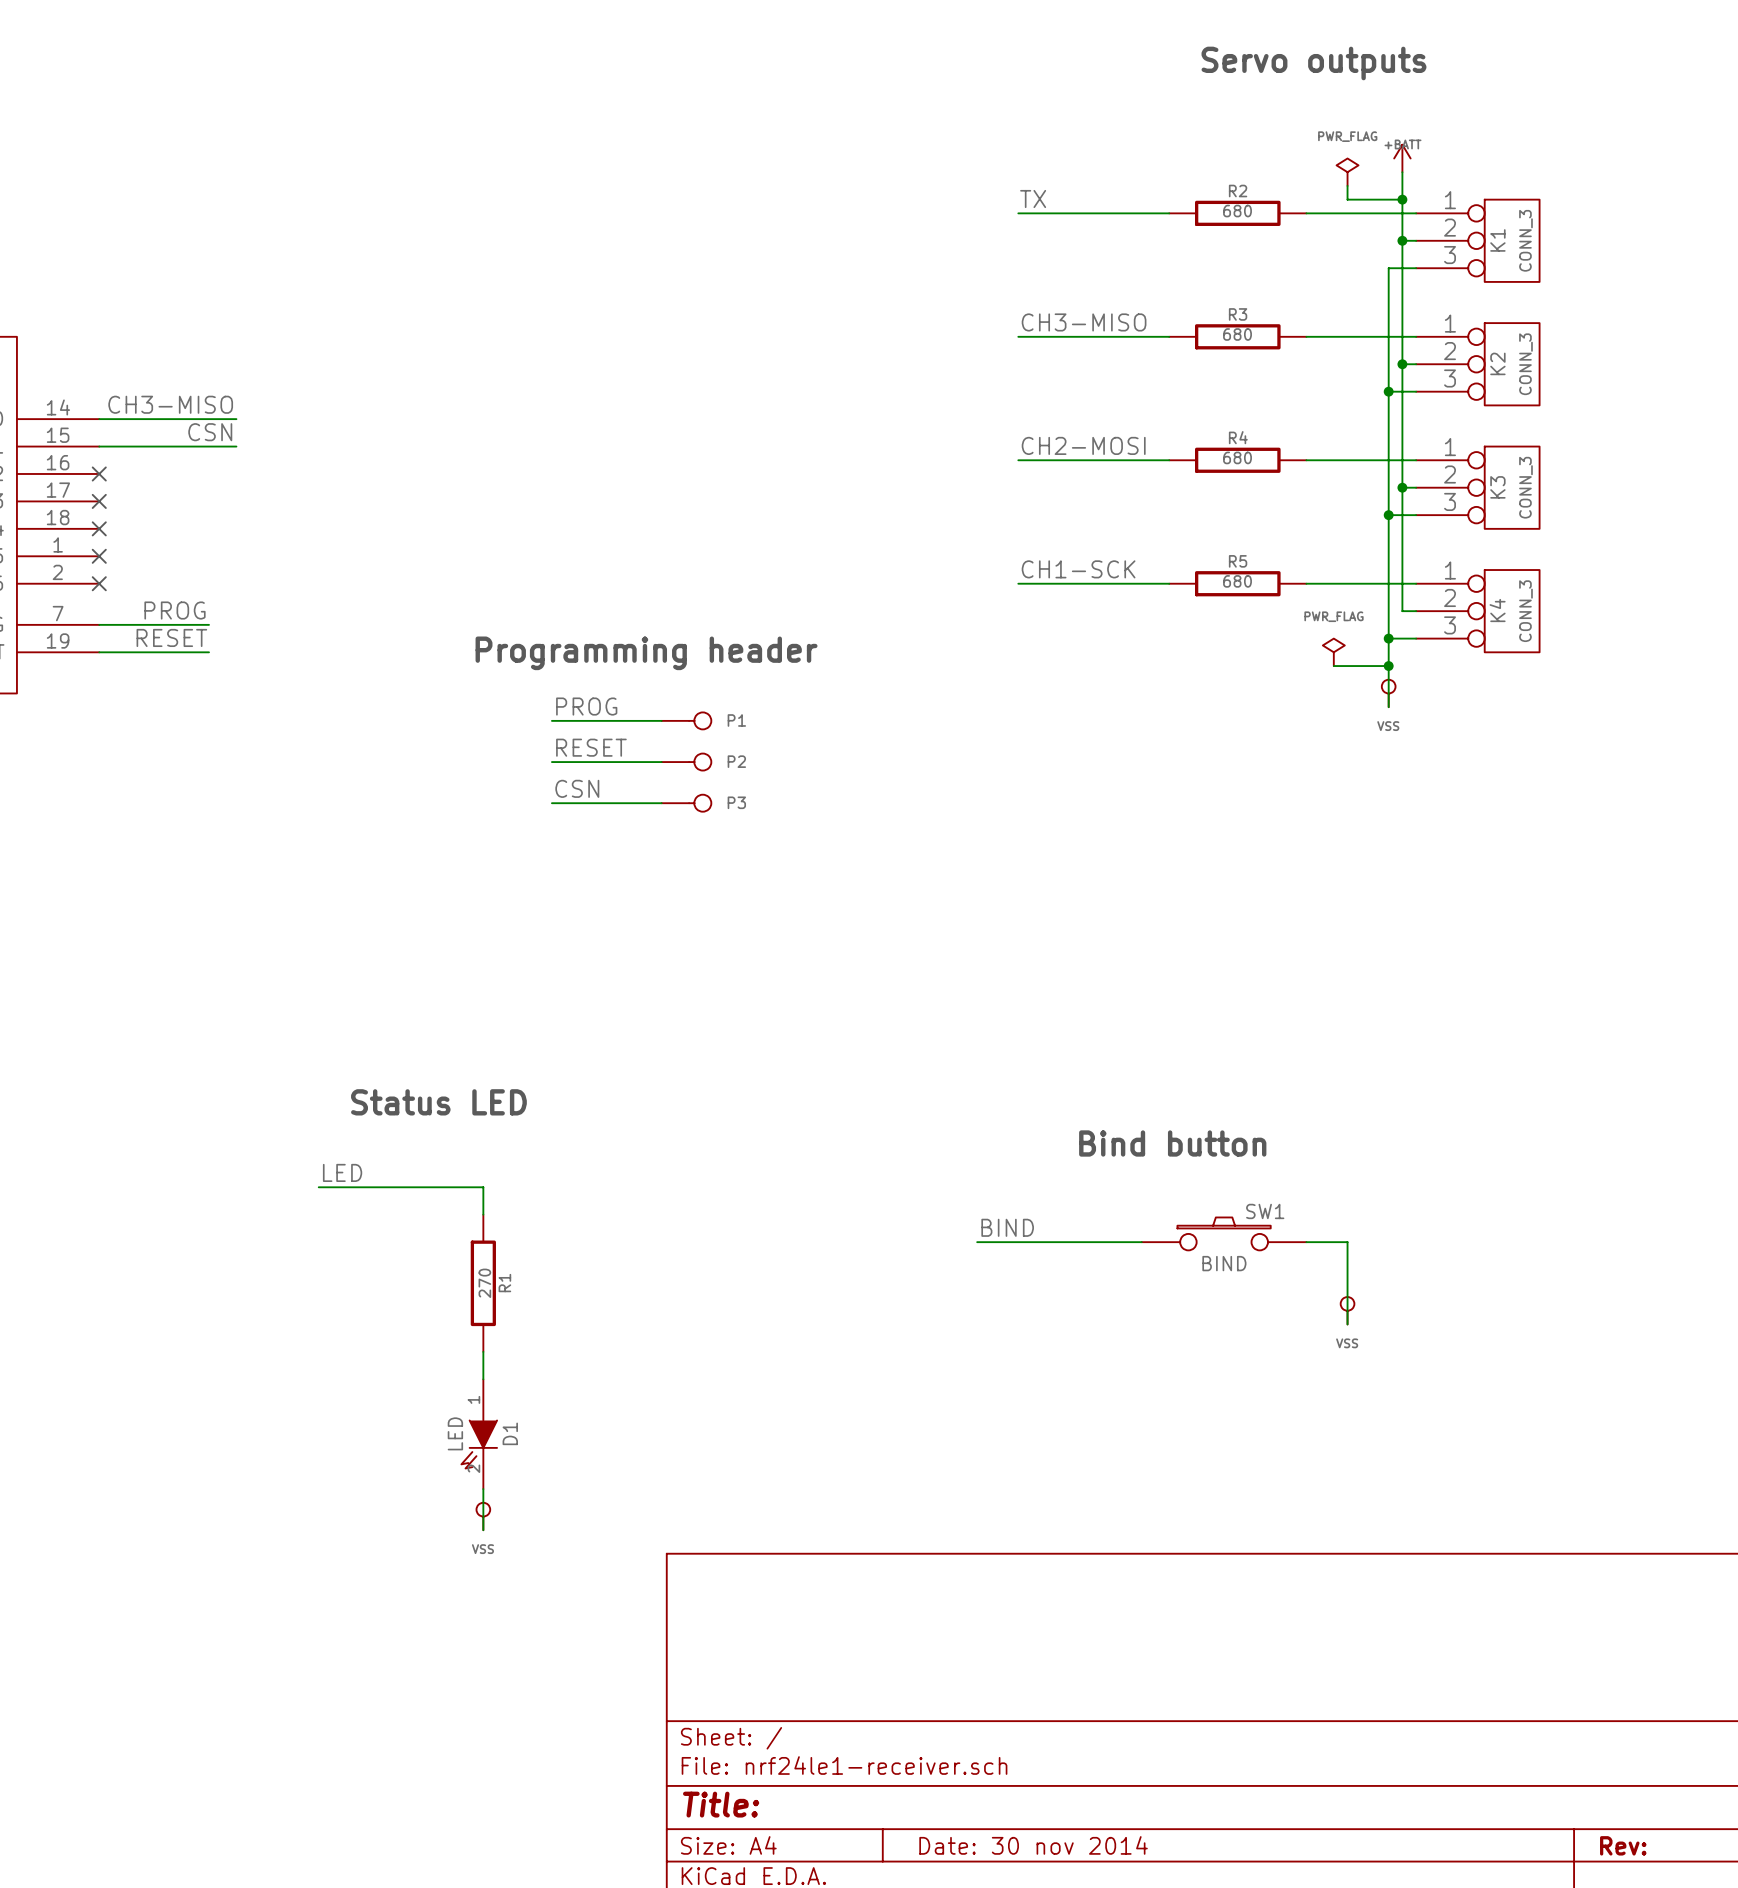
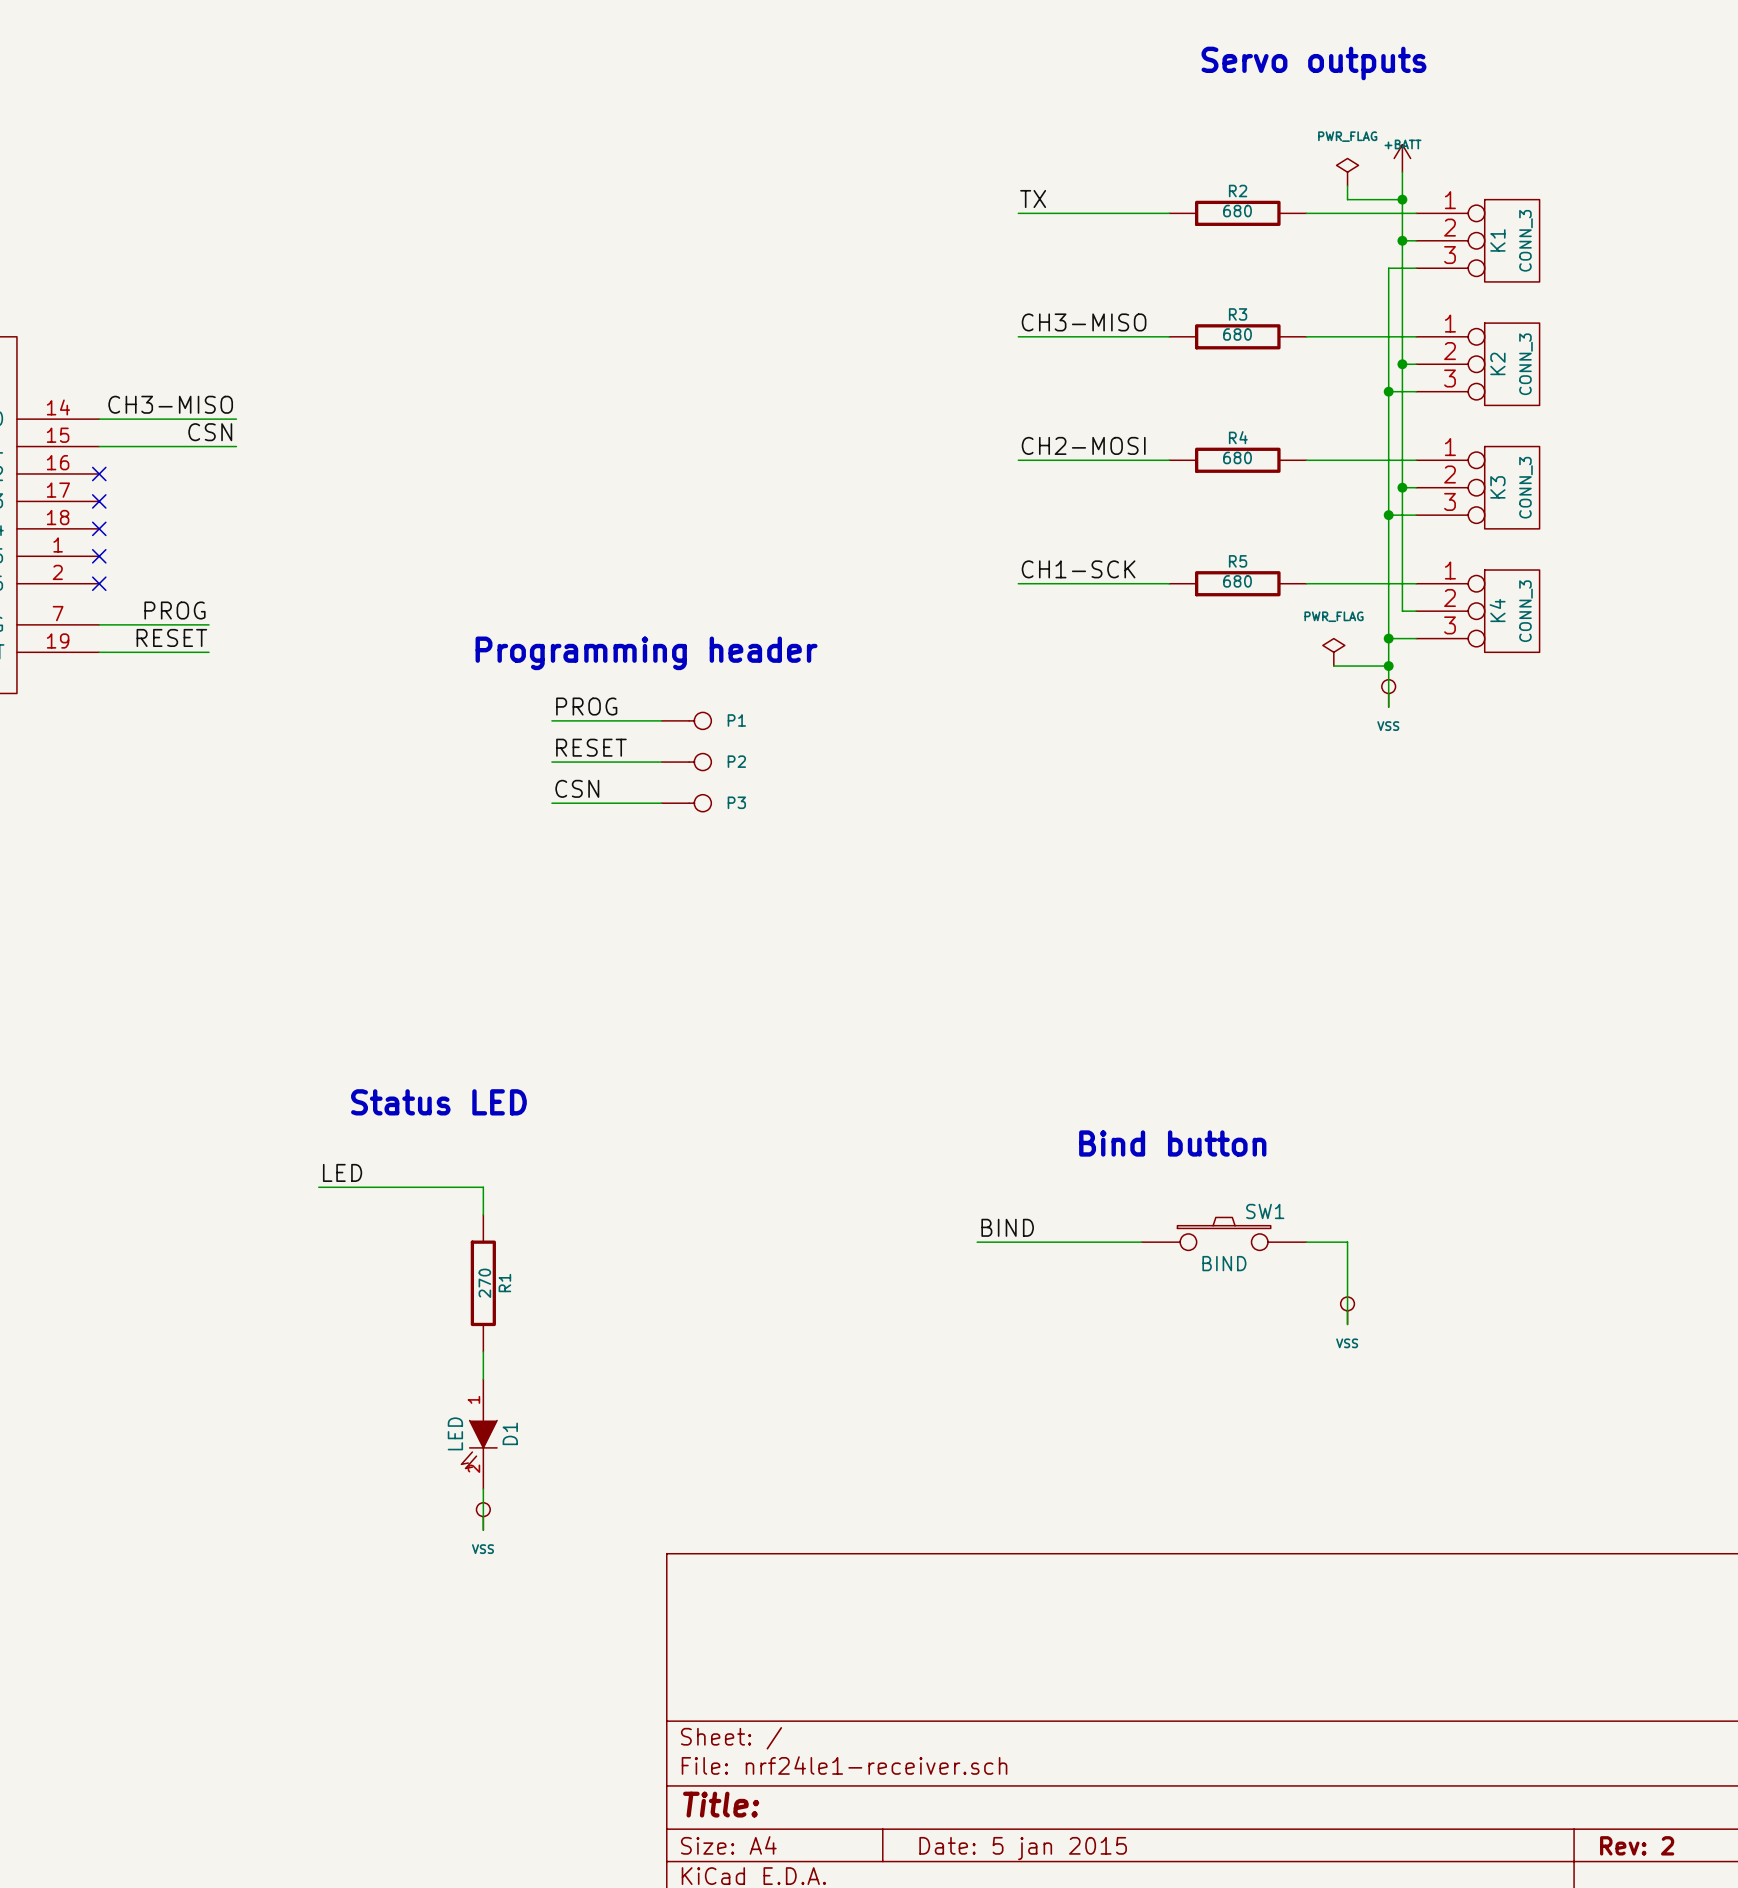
title block: Date: 30 nov 2014 (1033, 1845) -> Date: 5 jan 2015 (1023, 1848)
title block: Rev: (1623, 1845) -> Rev: 2 (1637, 1845)

